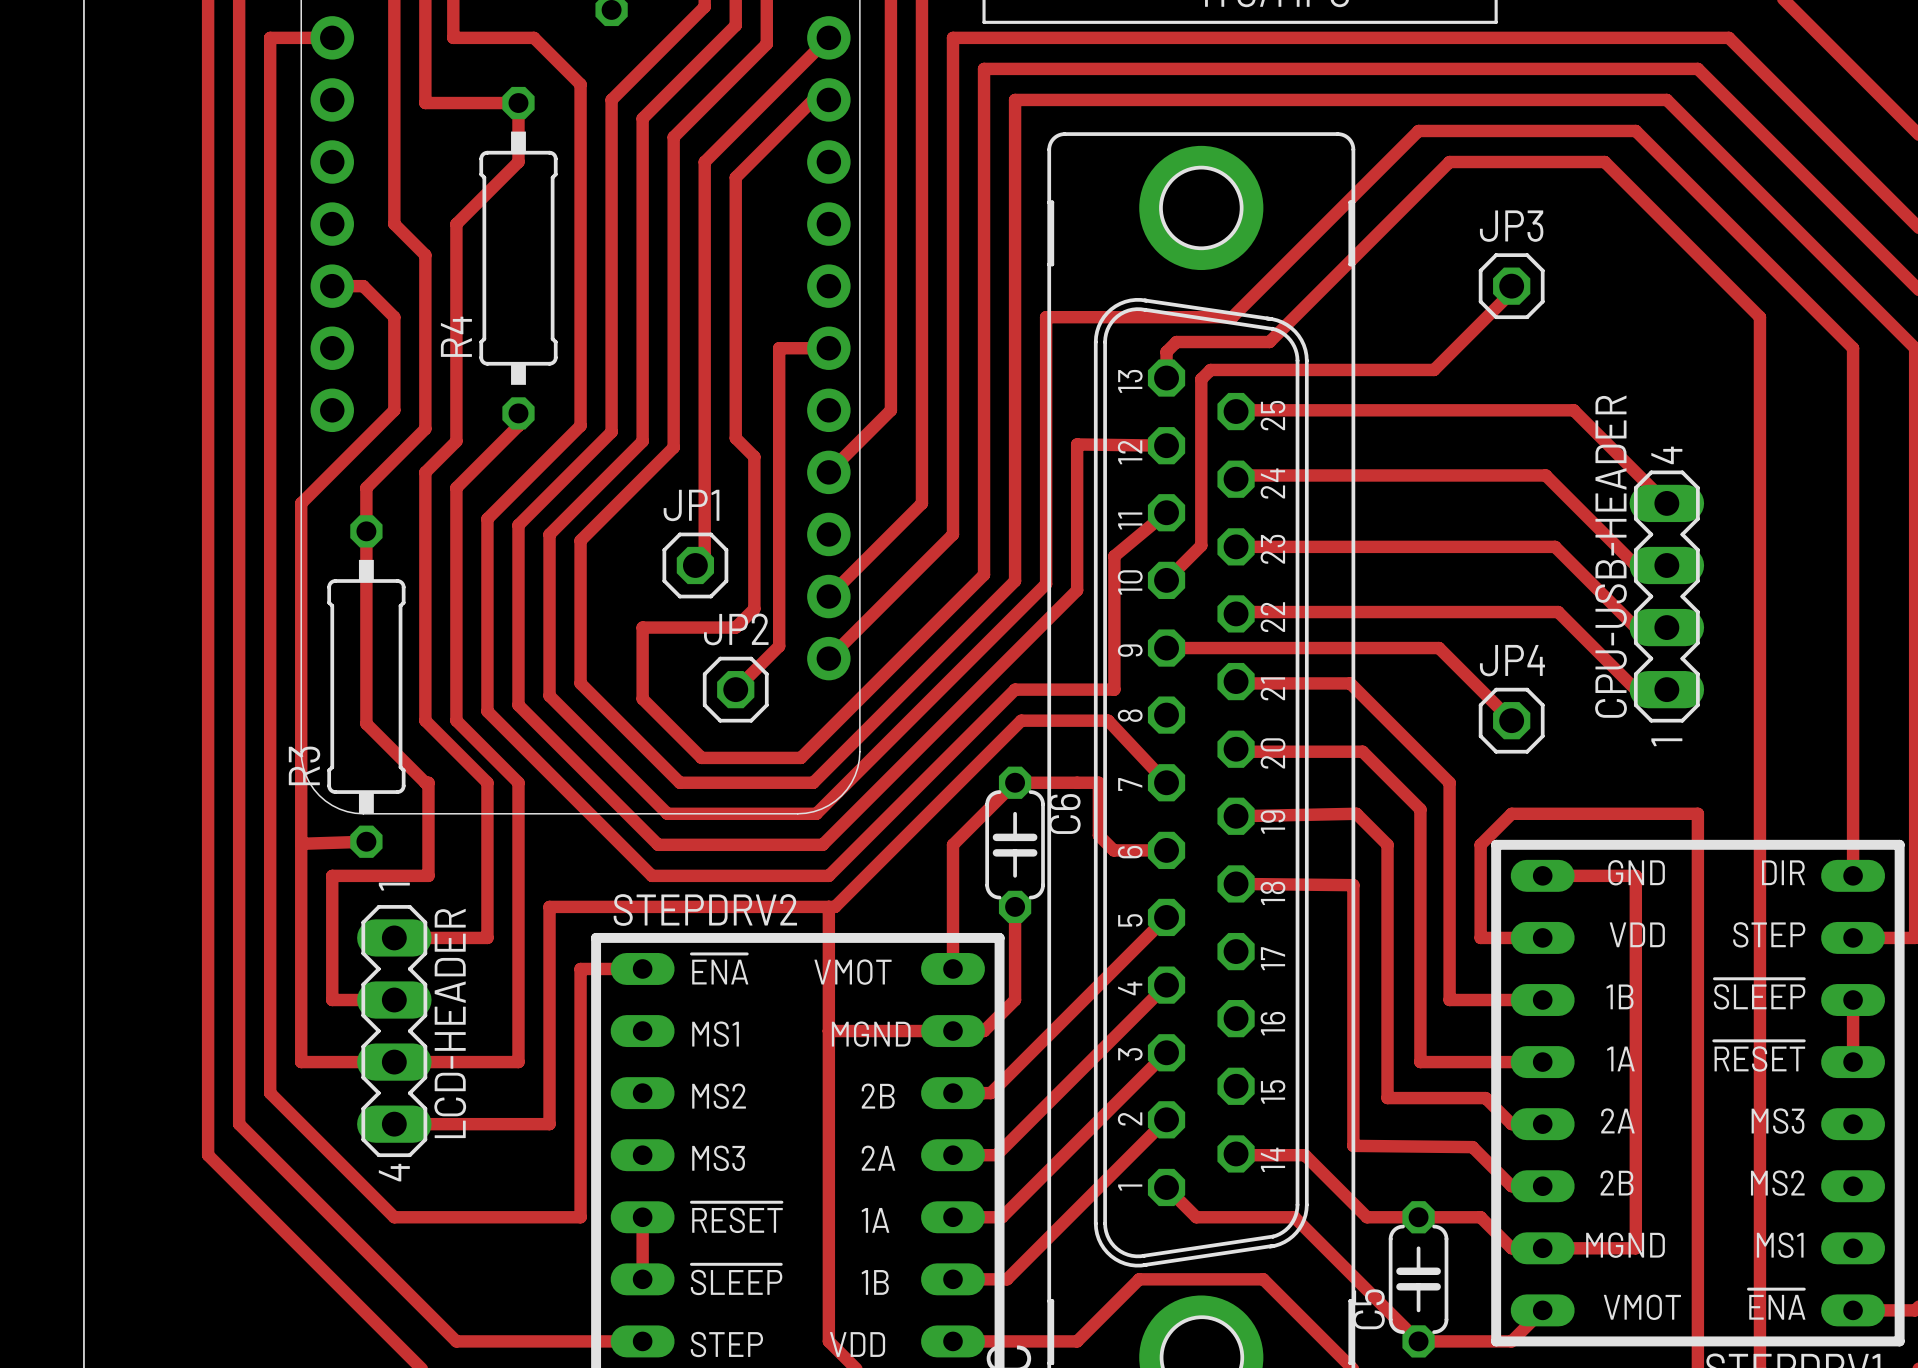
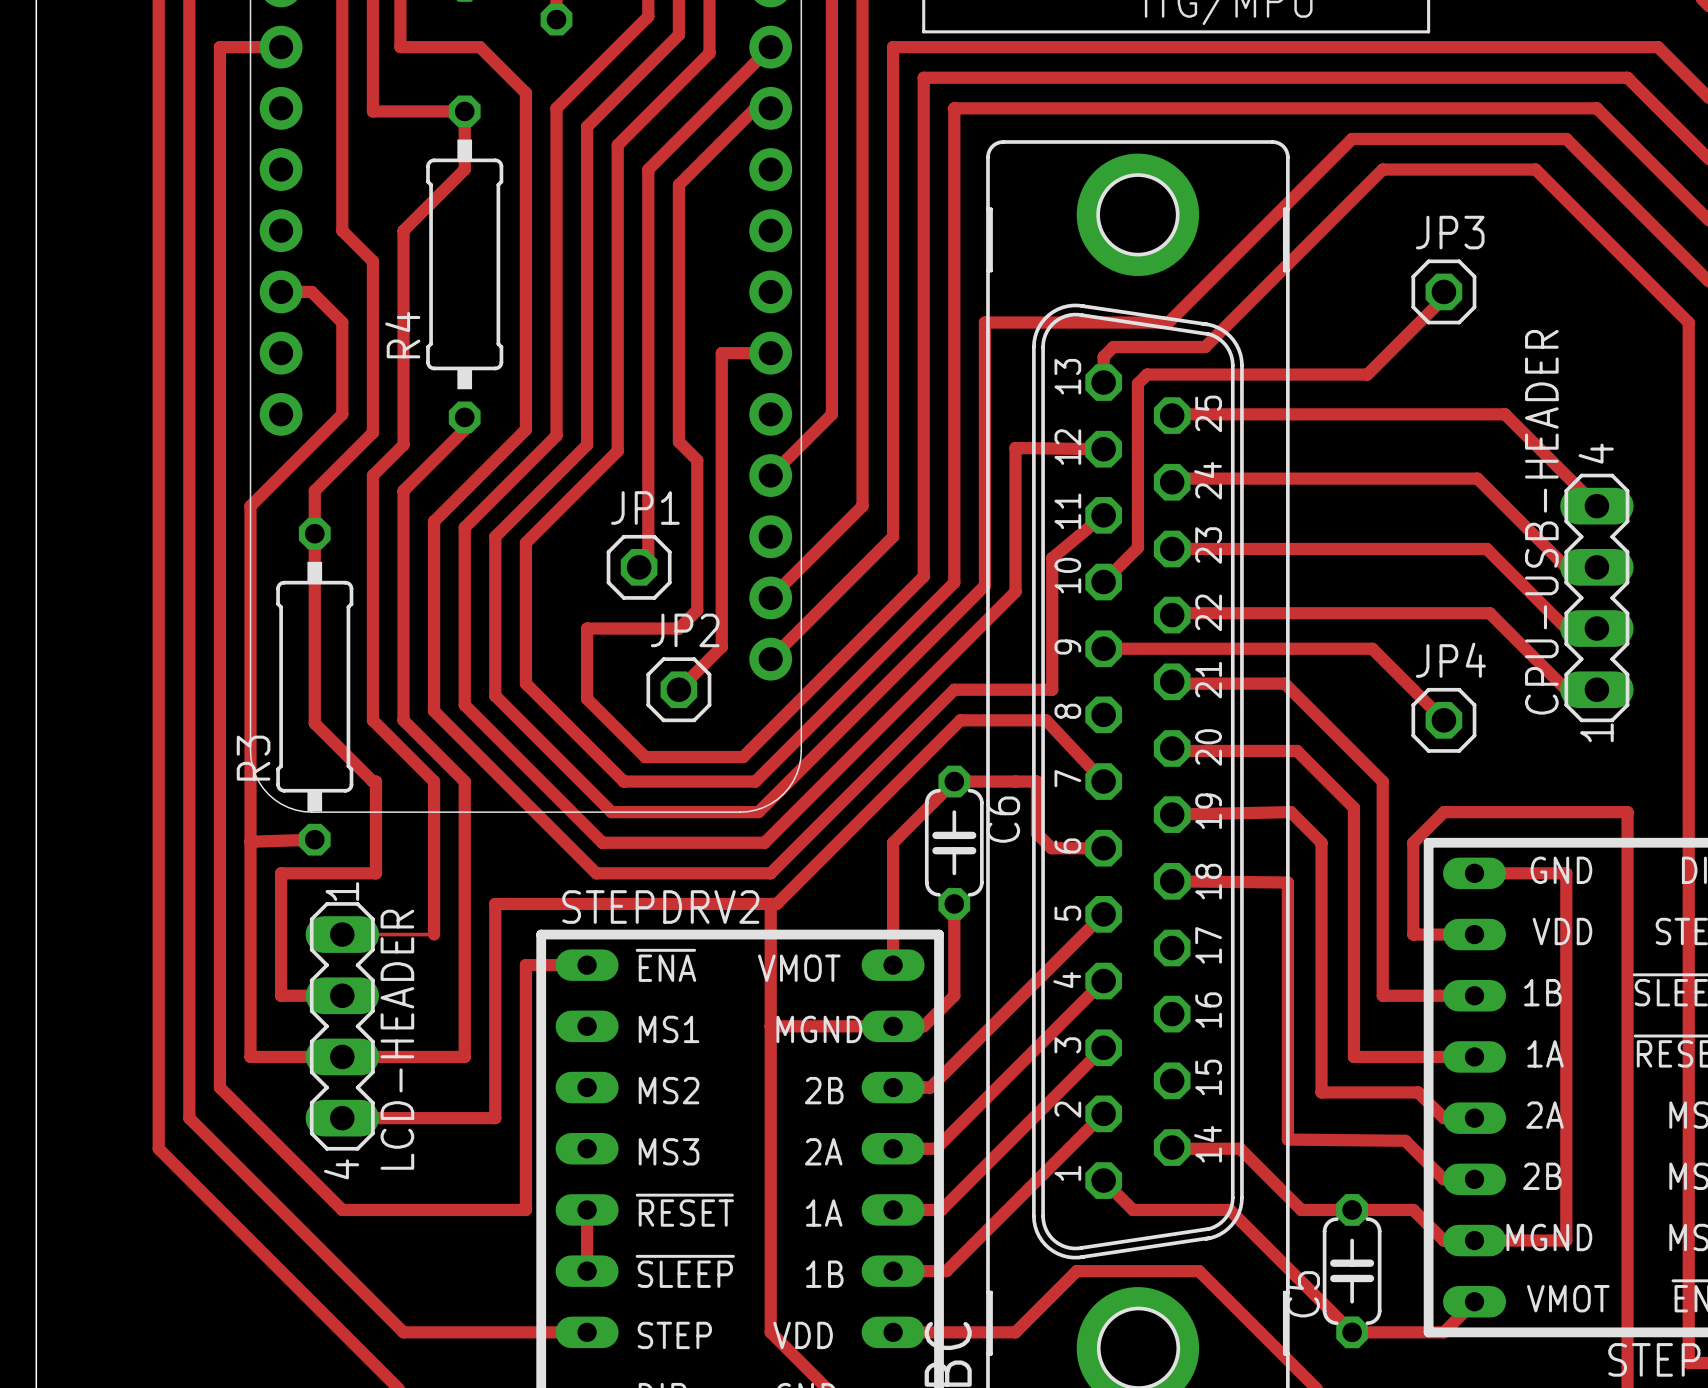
track width: thick (394, 937) (487, 937) -> thin (342, 934) (434, 934)

